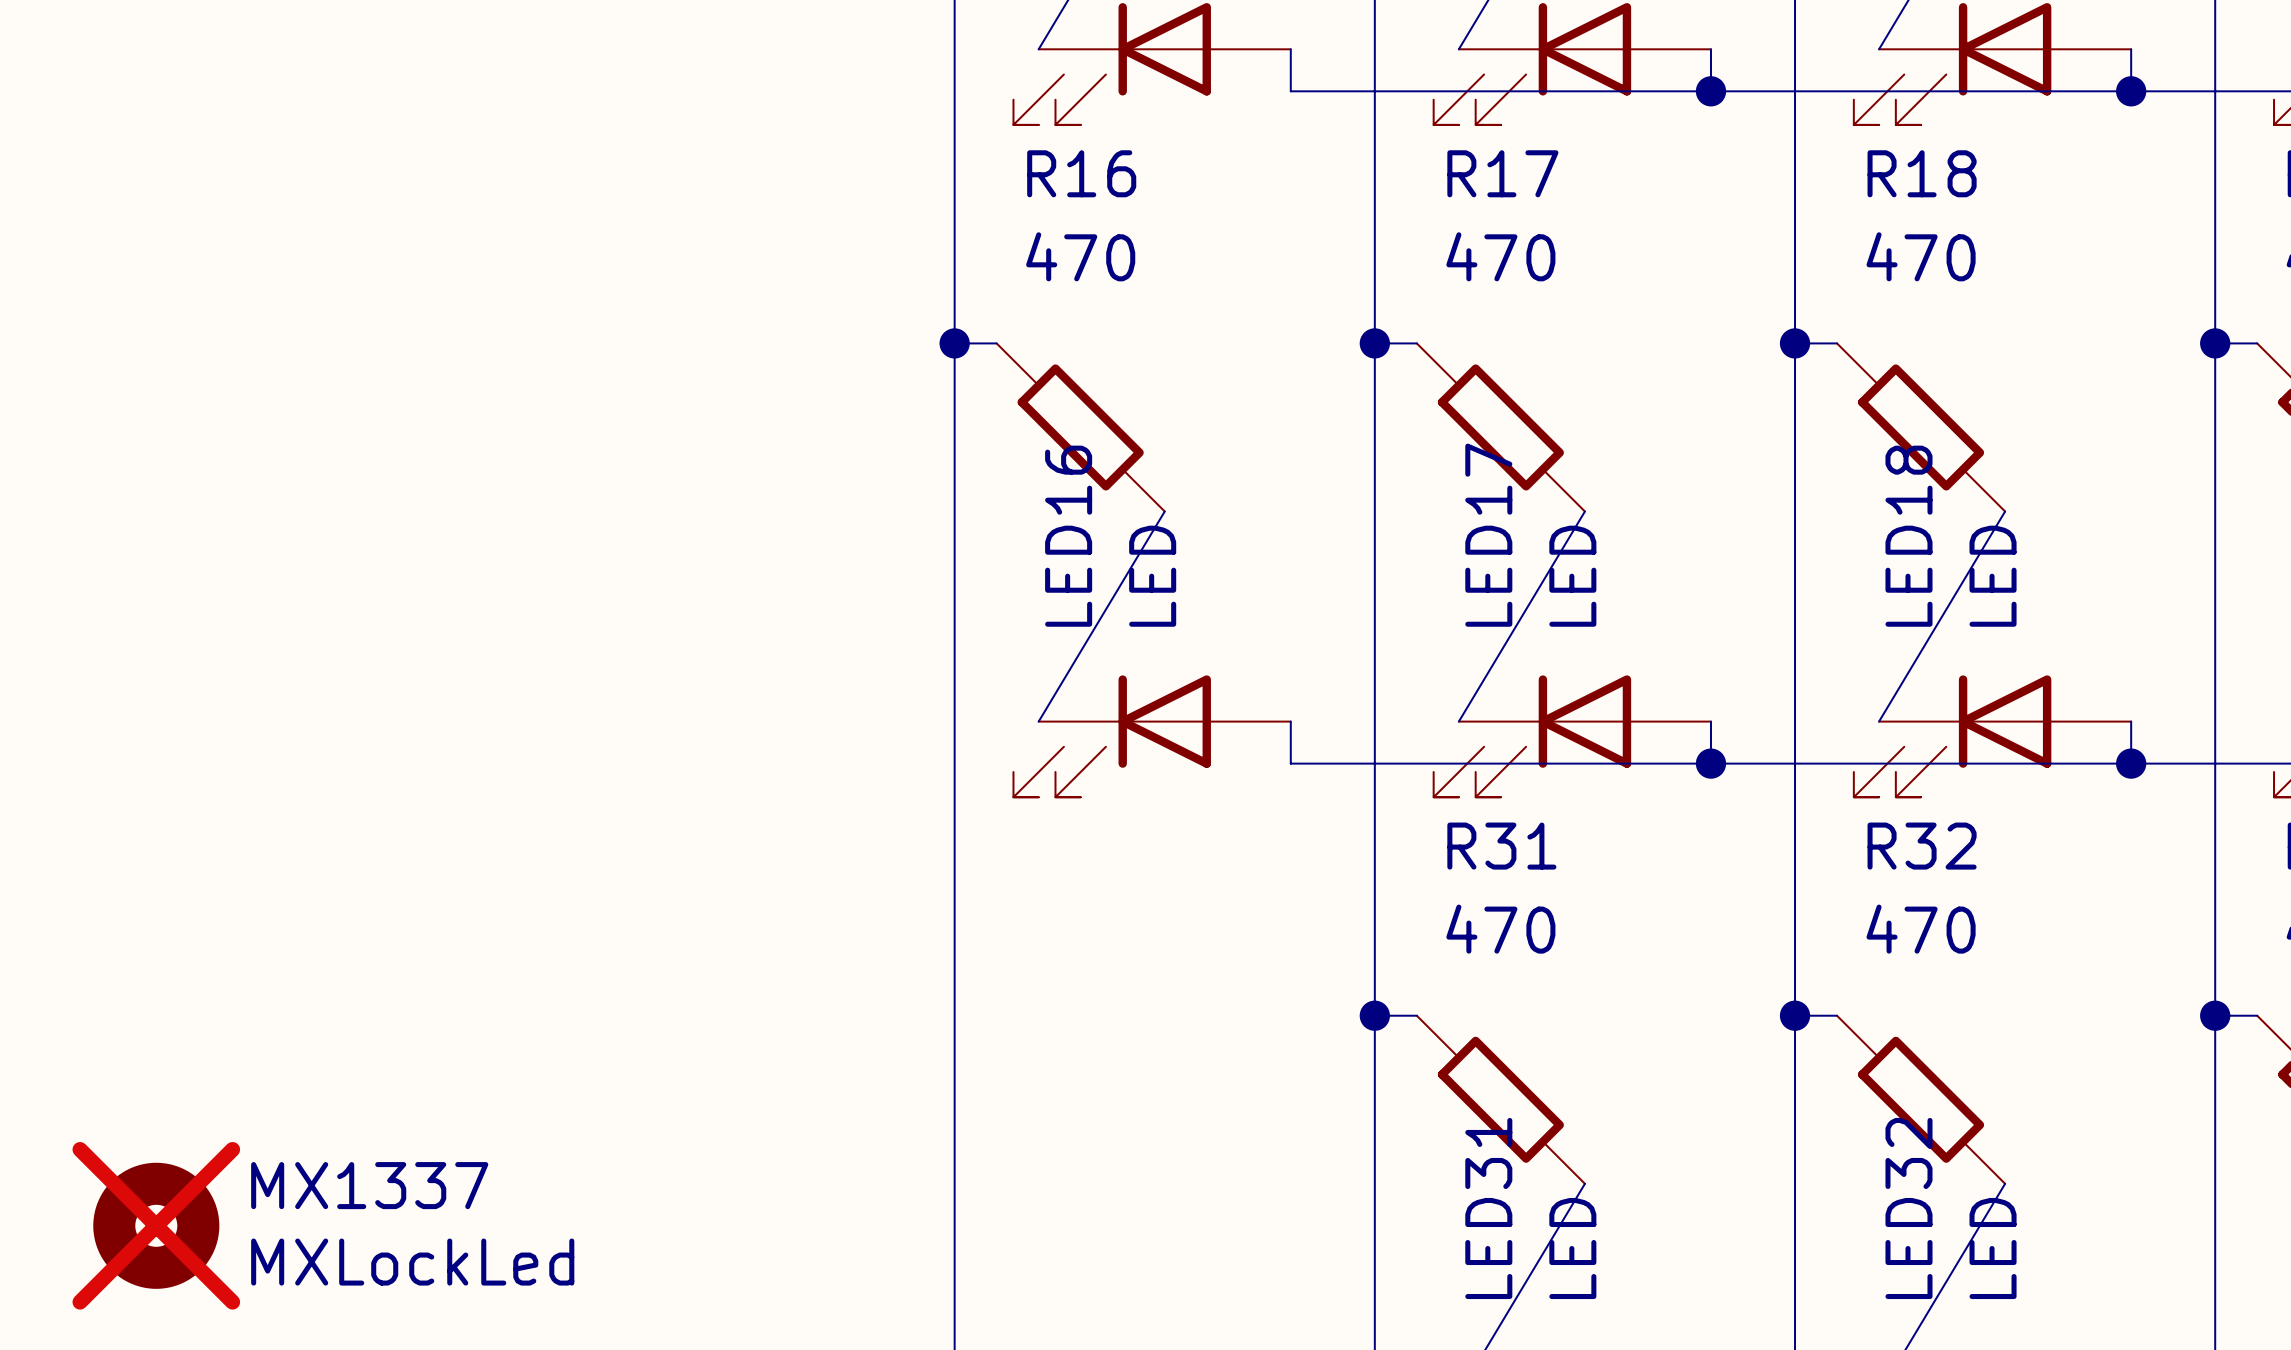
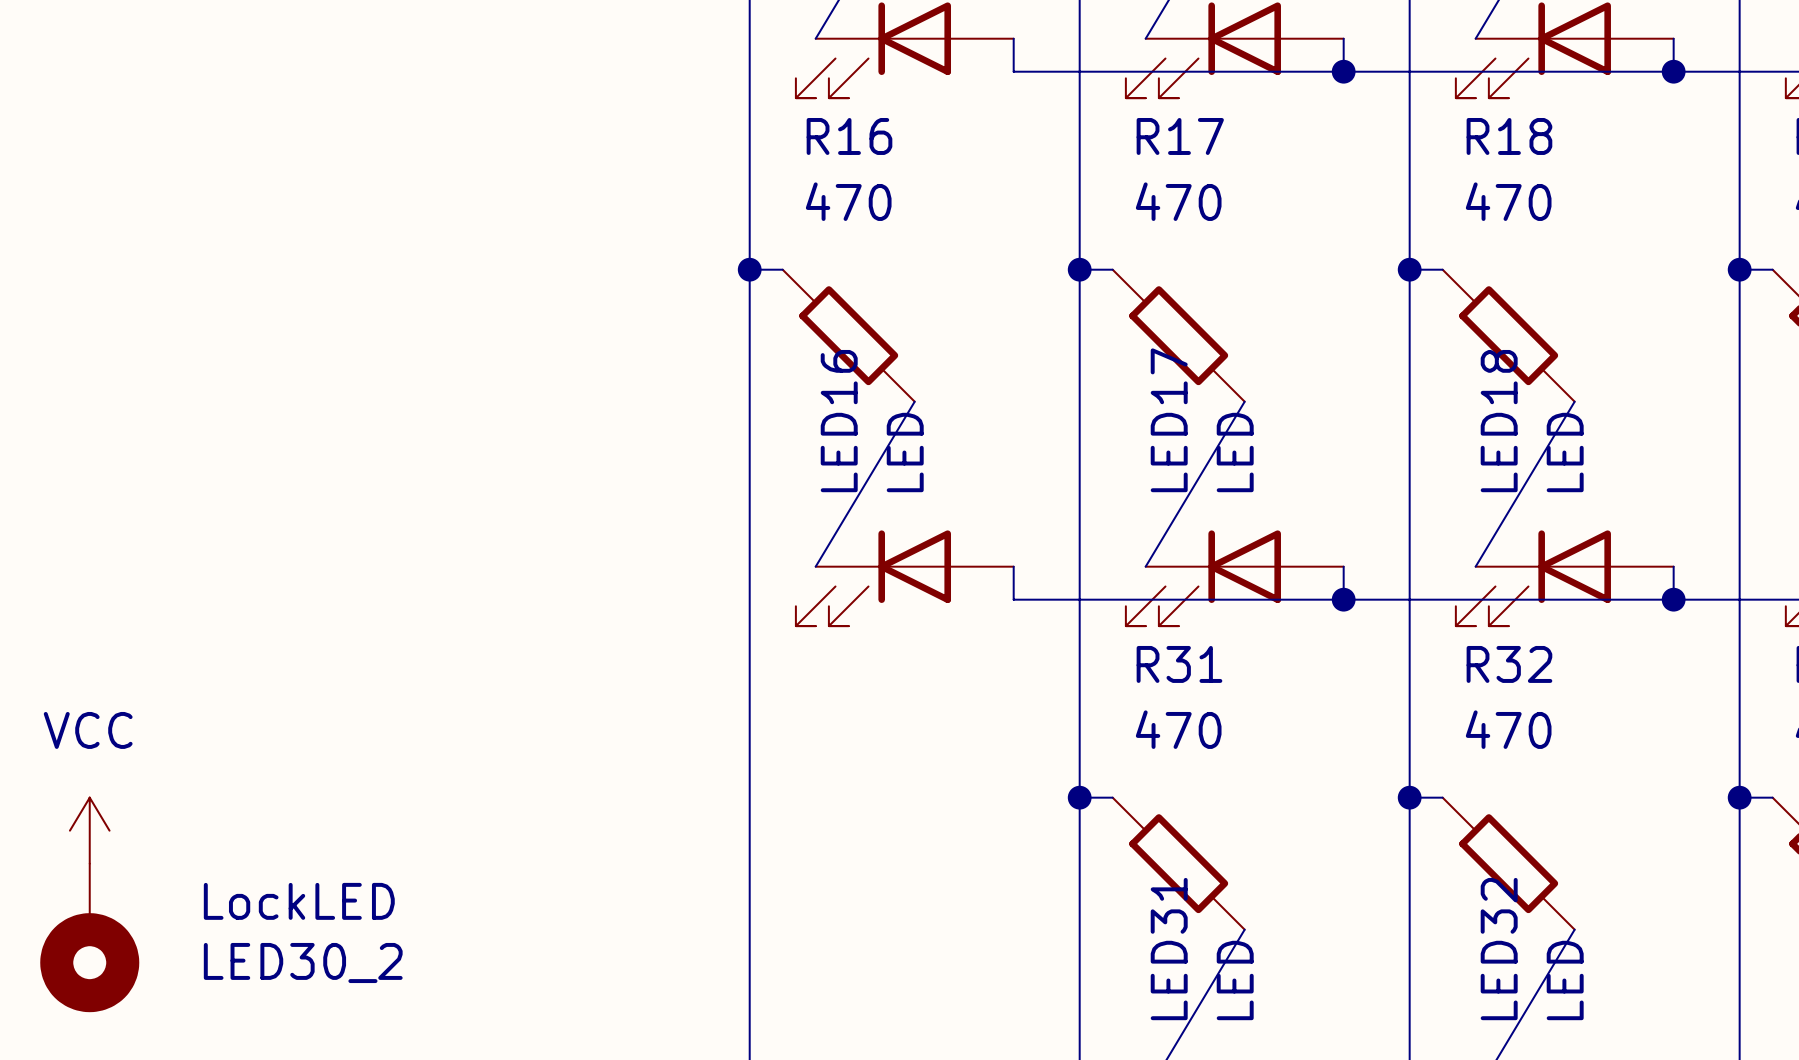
power symbol: none -> VCC (89, 830)
LED30_2: none -> LockLED (89, 937)
MX1337: MXLockLed (156, 1225) -> none

